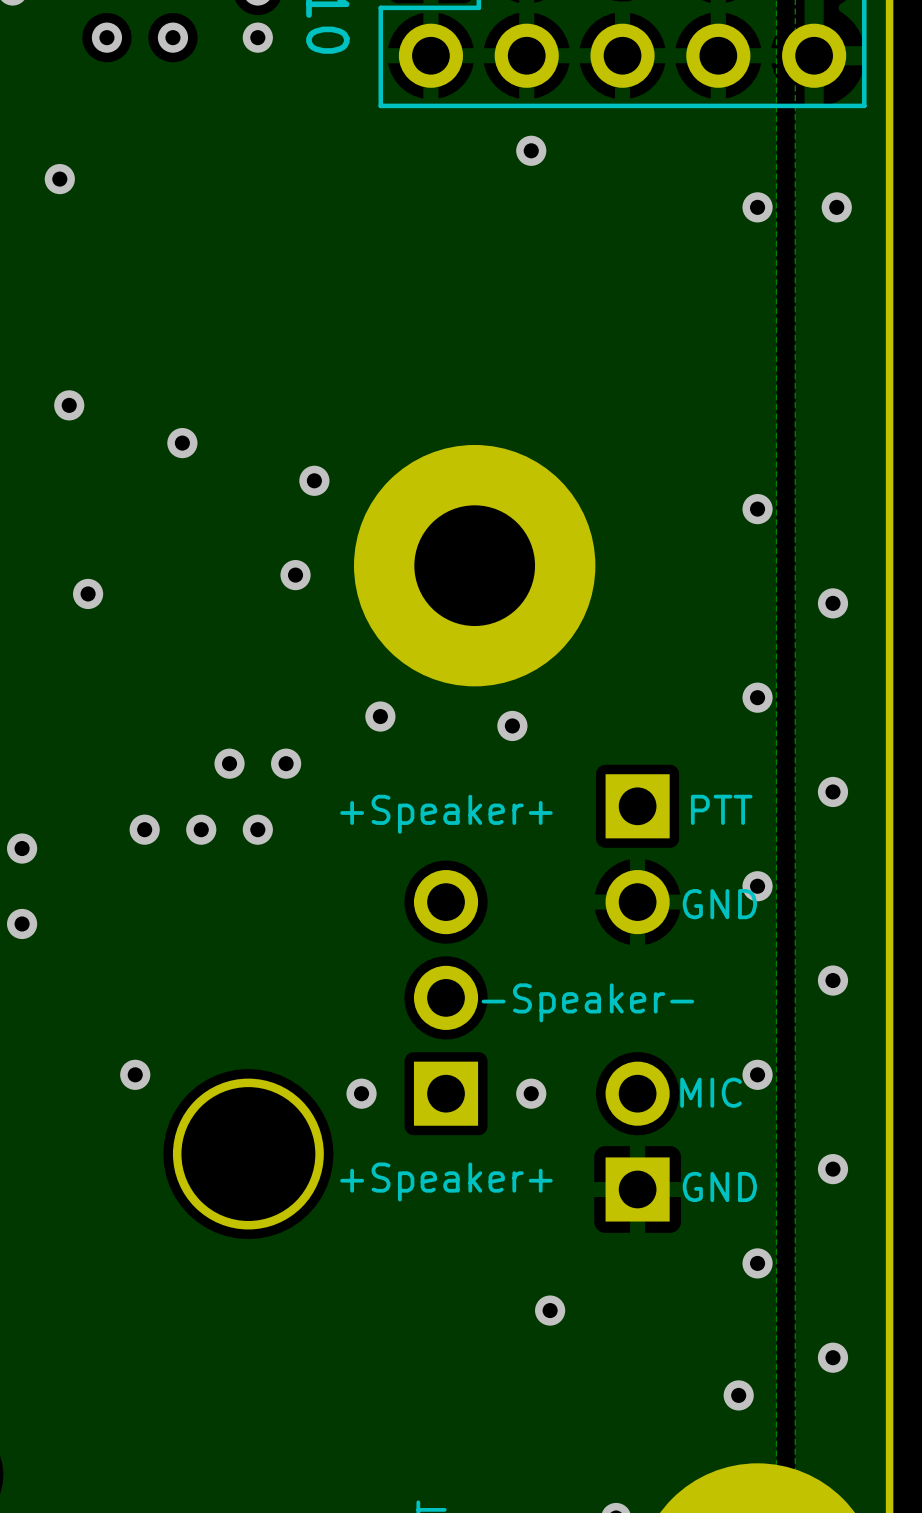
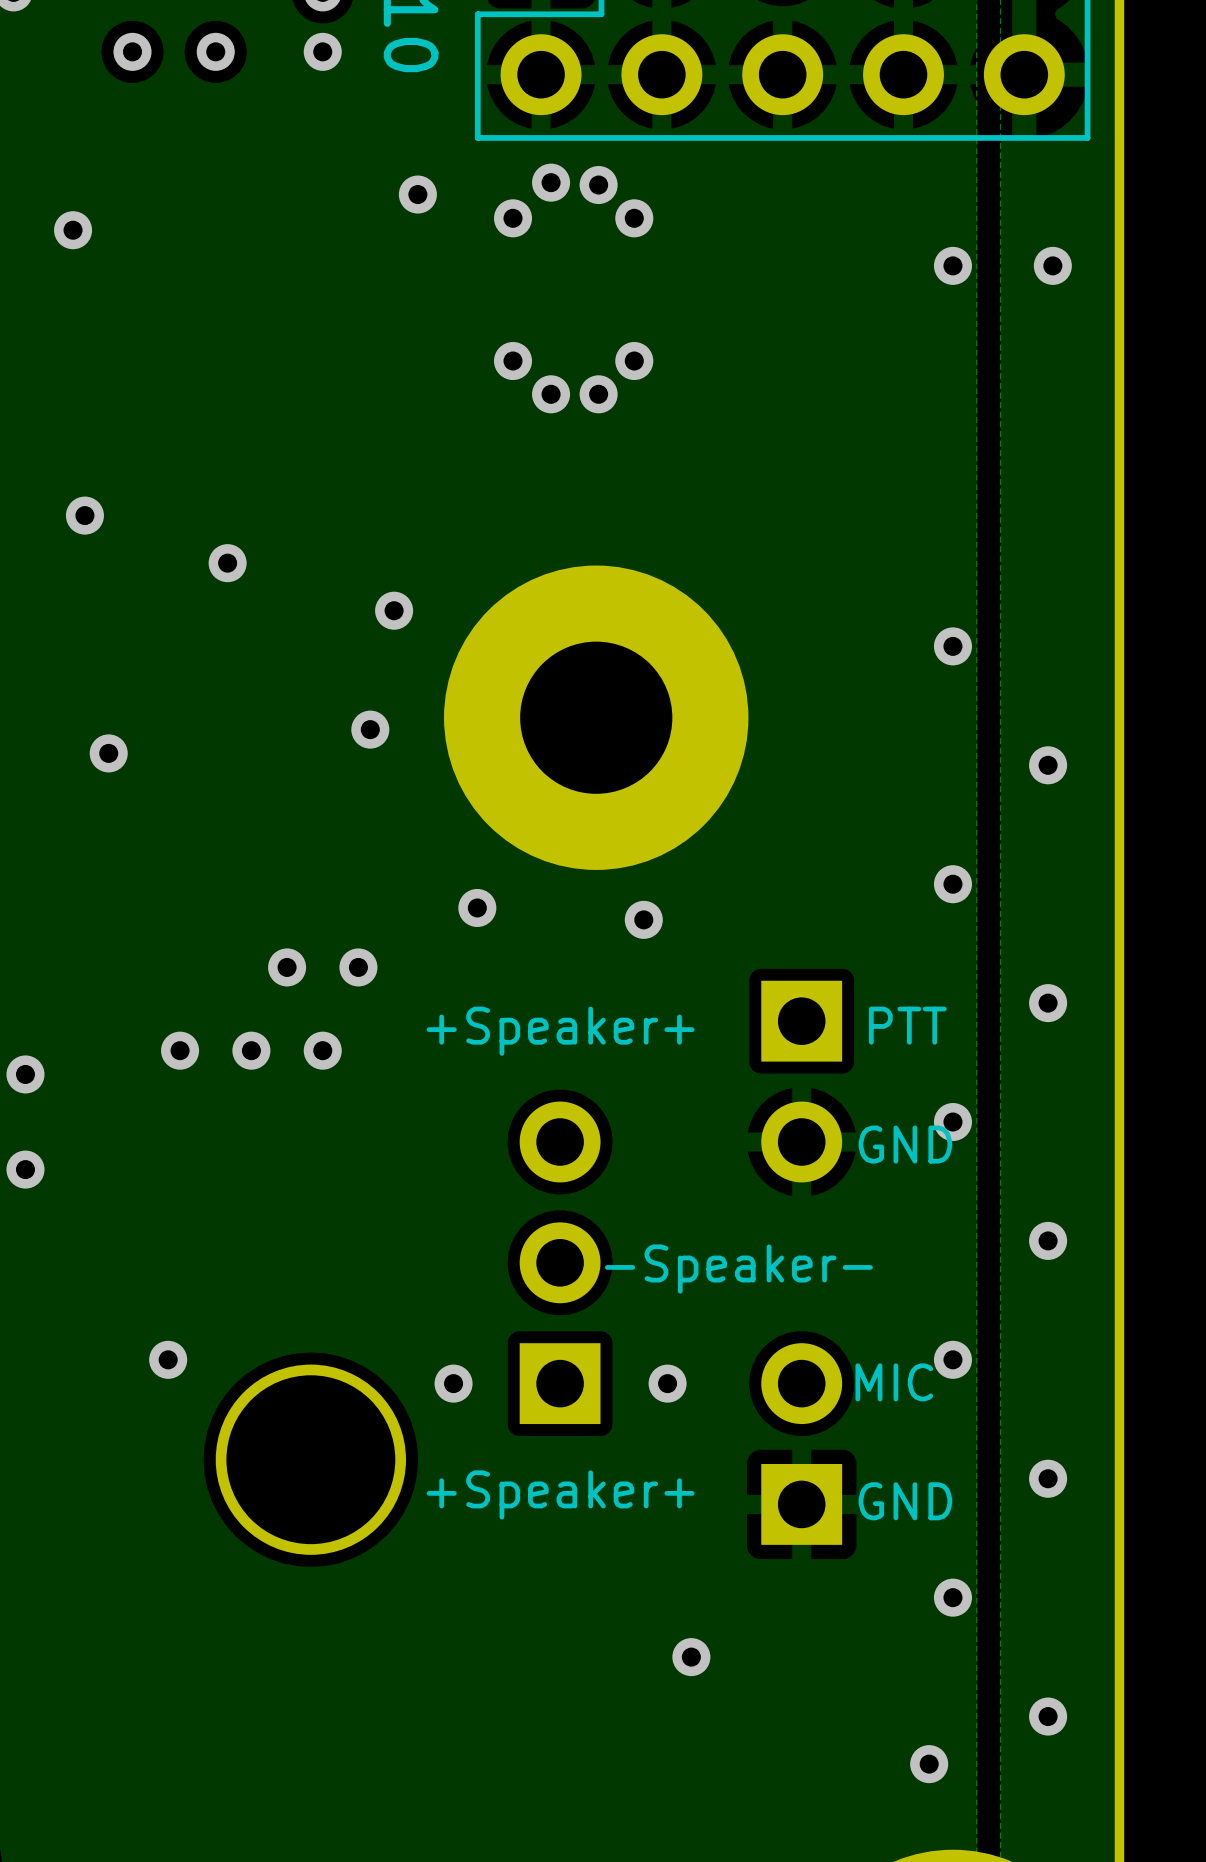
via: none -> (551, 182)
via: none -> (598, 185)
via: none -> (417, 194)
via position: (531, 150) -> (634, 218)
via: none -> (513, 218)
via: none -> (513, 361)
via: none -> (634, 361)
via: none -> (551, 394)
via: none -> (598, 394)

